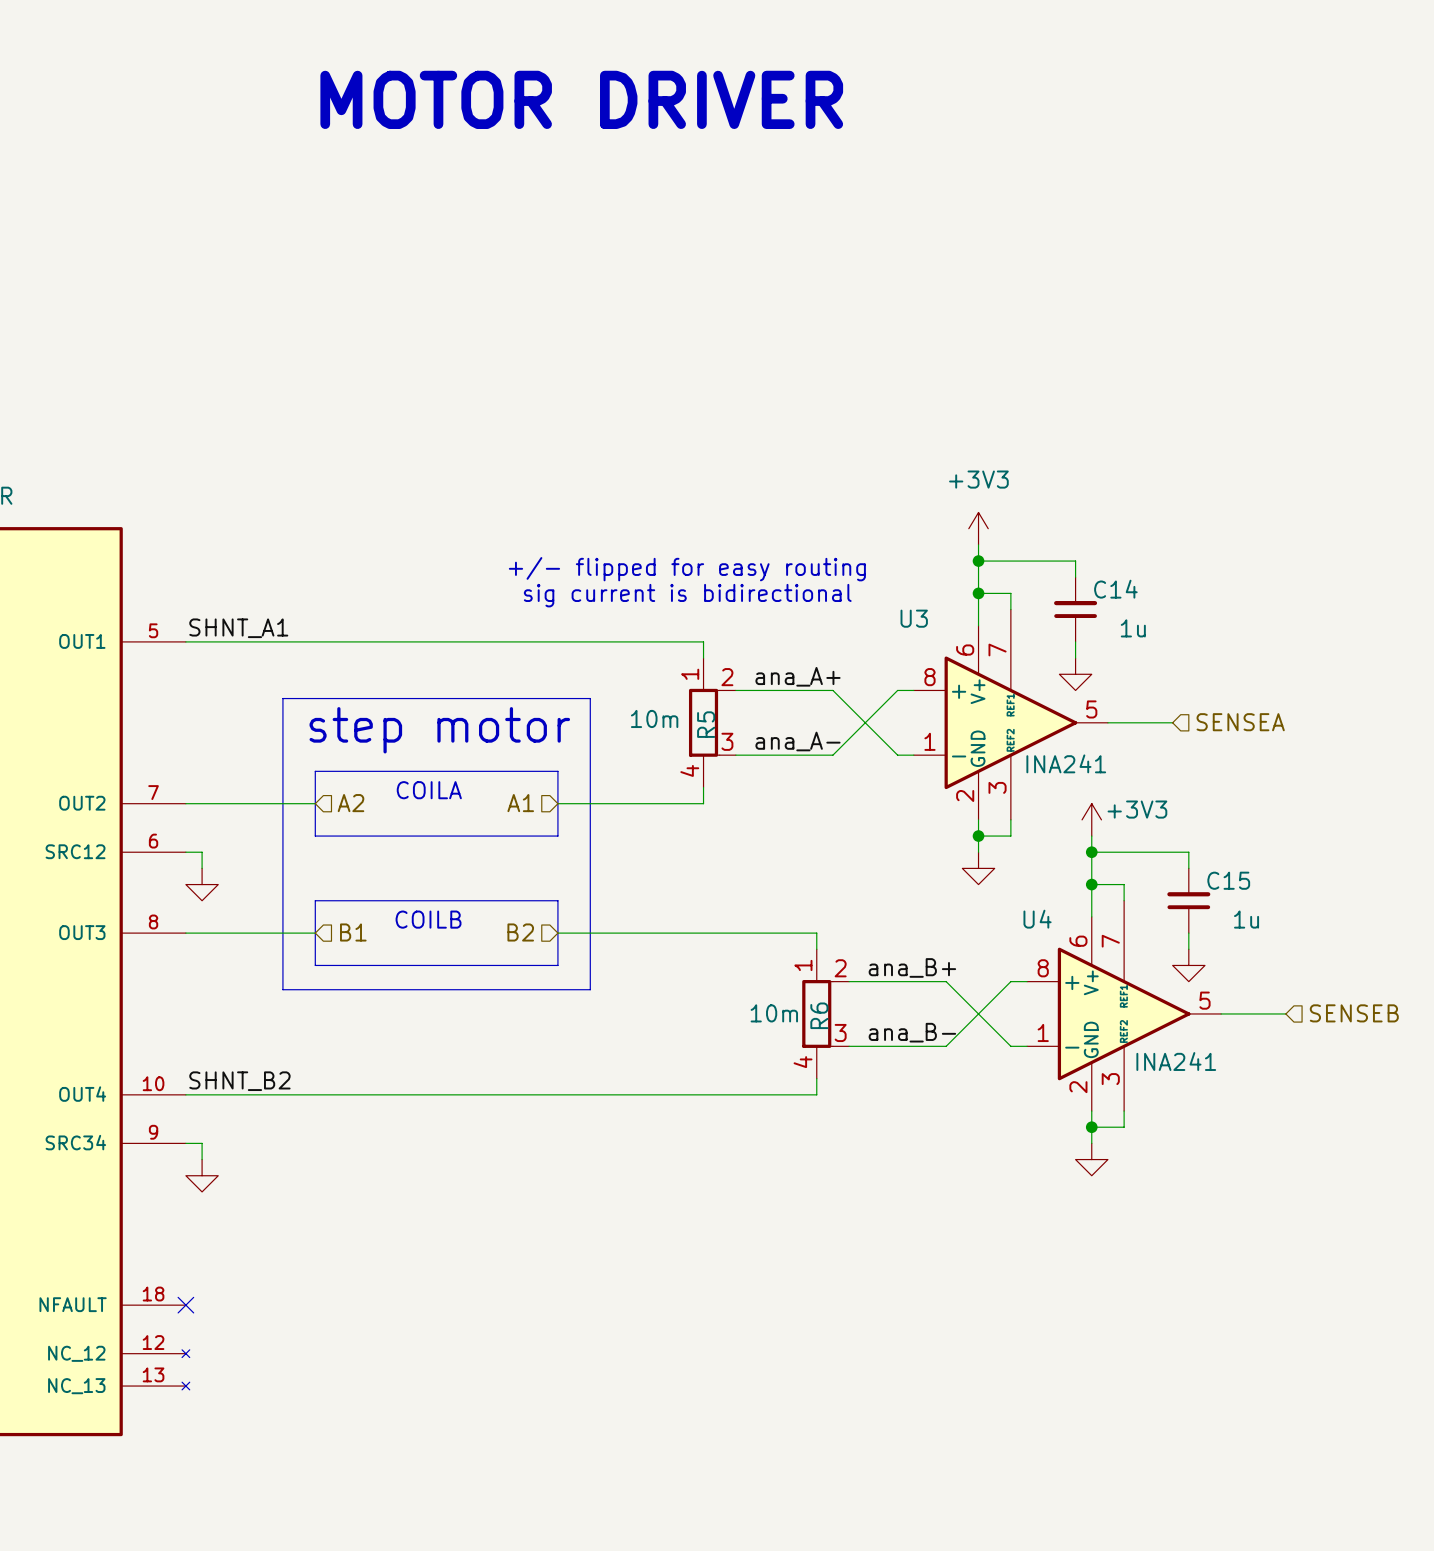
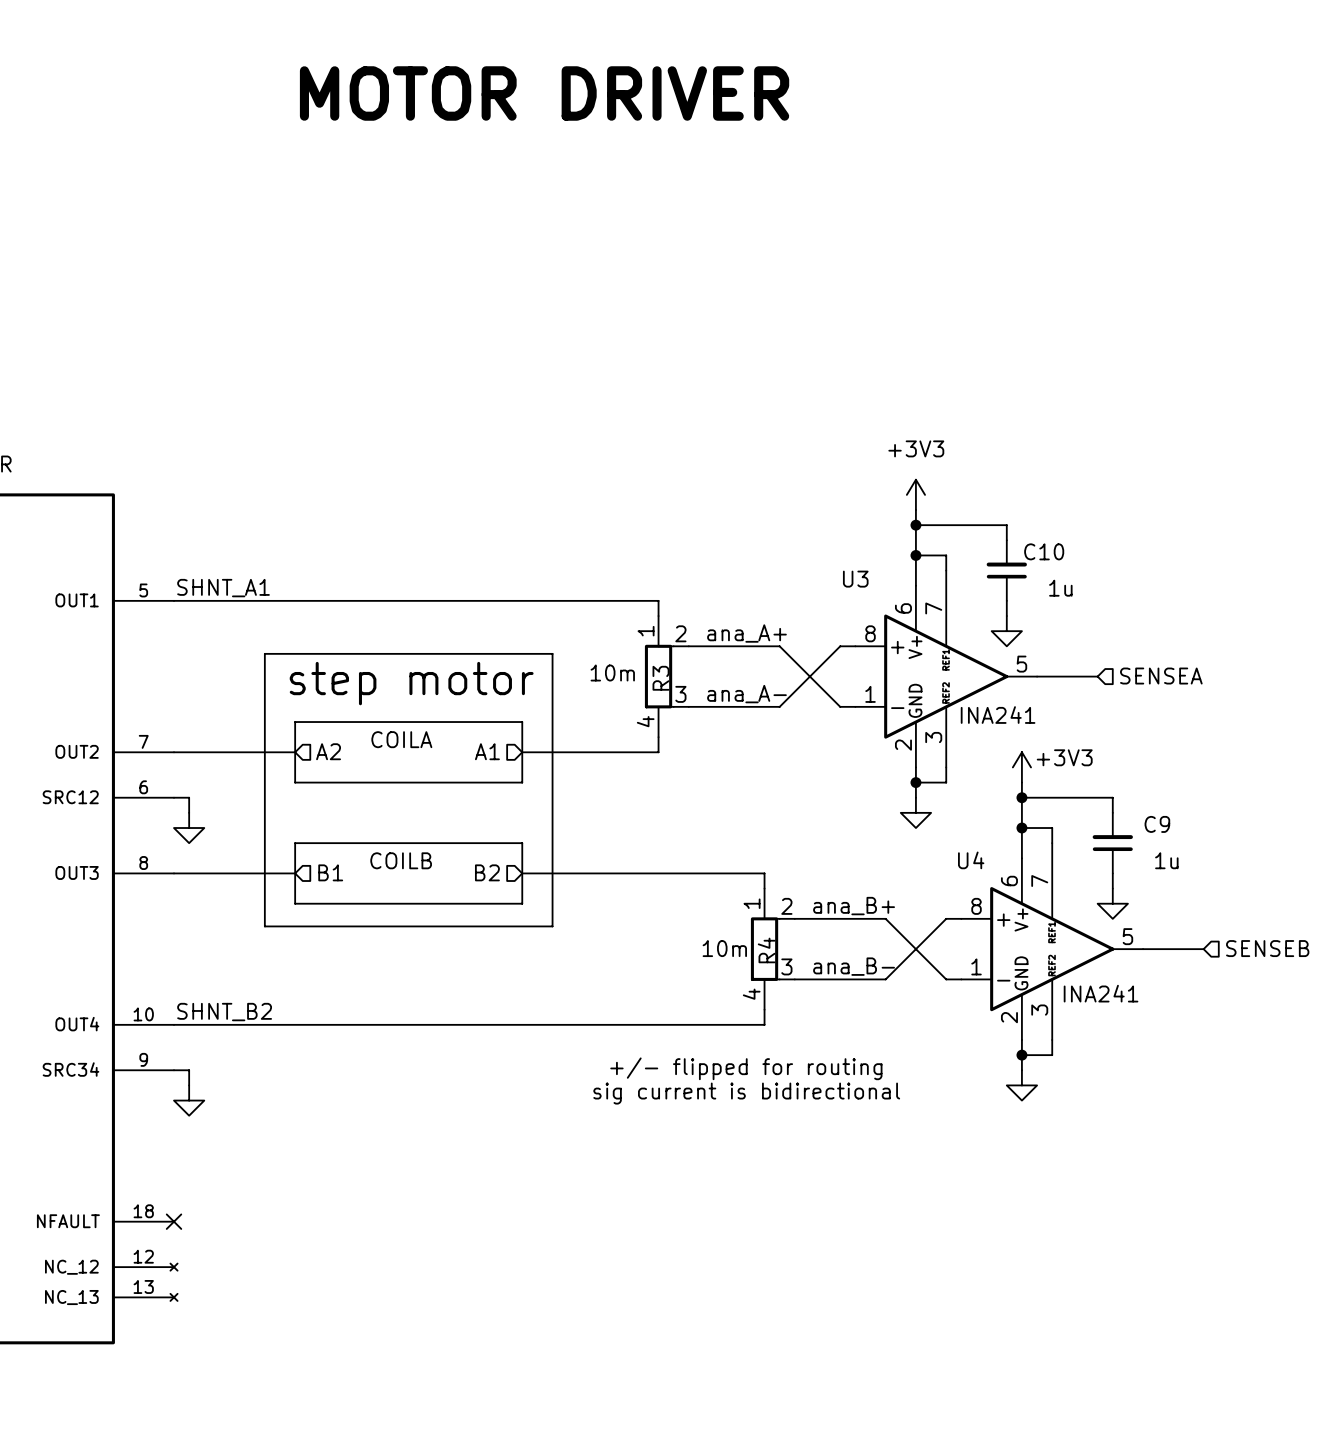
text: +/- flipped for easy routing (687, 569) -> none
C14 name: C14 (1115, 589) -> C10 (1044, 551)
text: sig current is bidirectional (687, 595) -> none
R5 name: R5 (706, 724) -> R3 (661, 678)
C15 name: C15 (1228, 880) -> C9 (1157, 824)
R6 name: R6 (819, 1015) -> R4 (766, 950)
text: none -> +/- flipped for routing (746, 1068)
text: none -> sig current is bidirectional (746, 1093)

